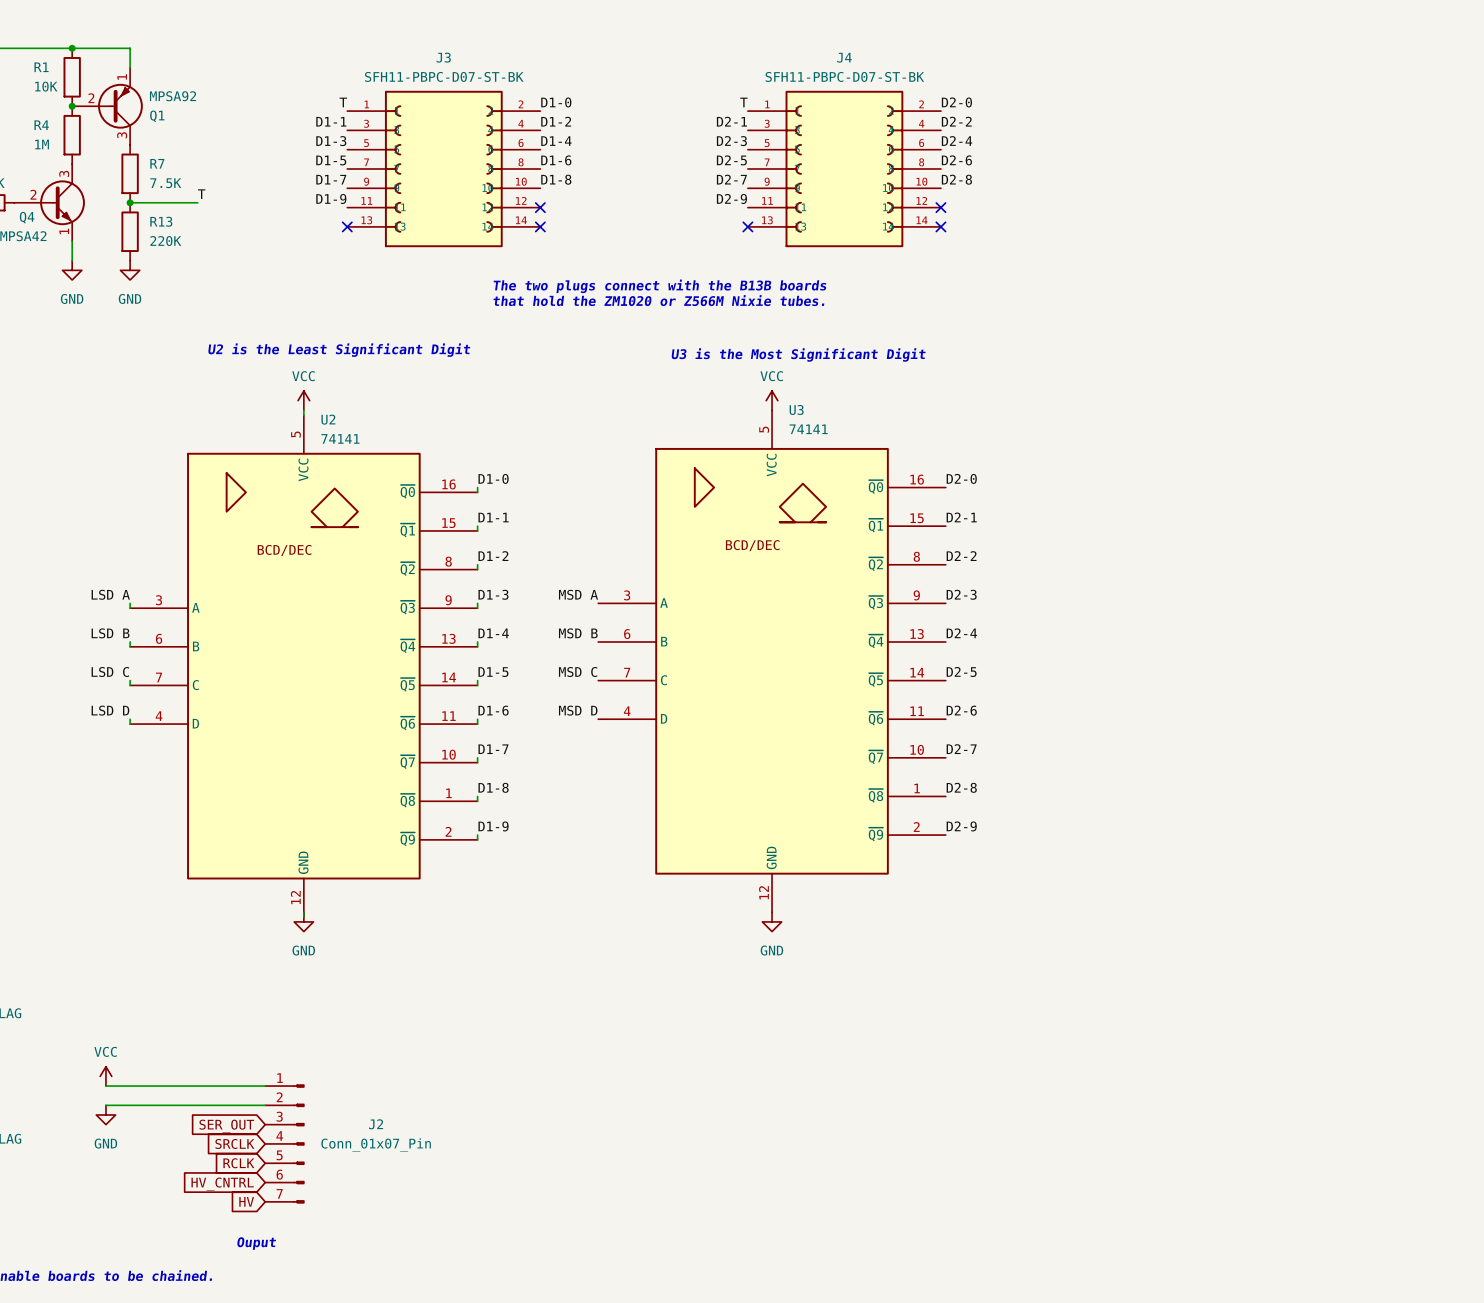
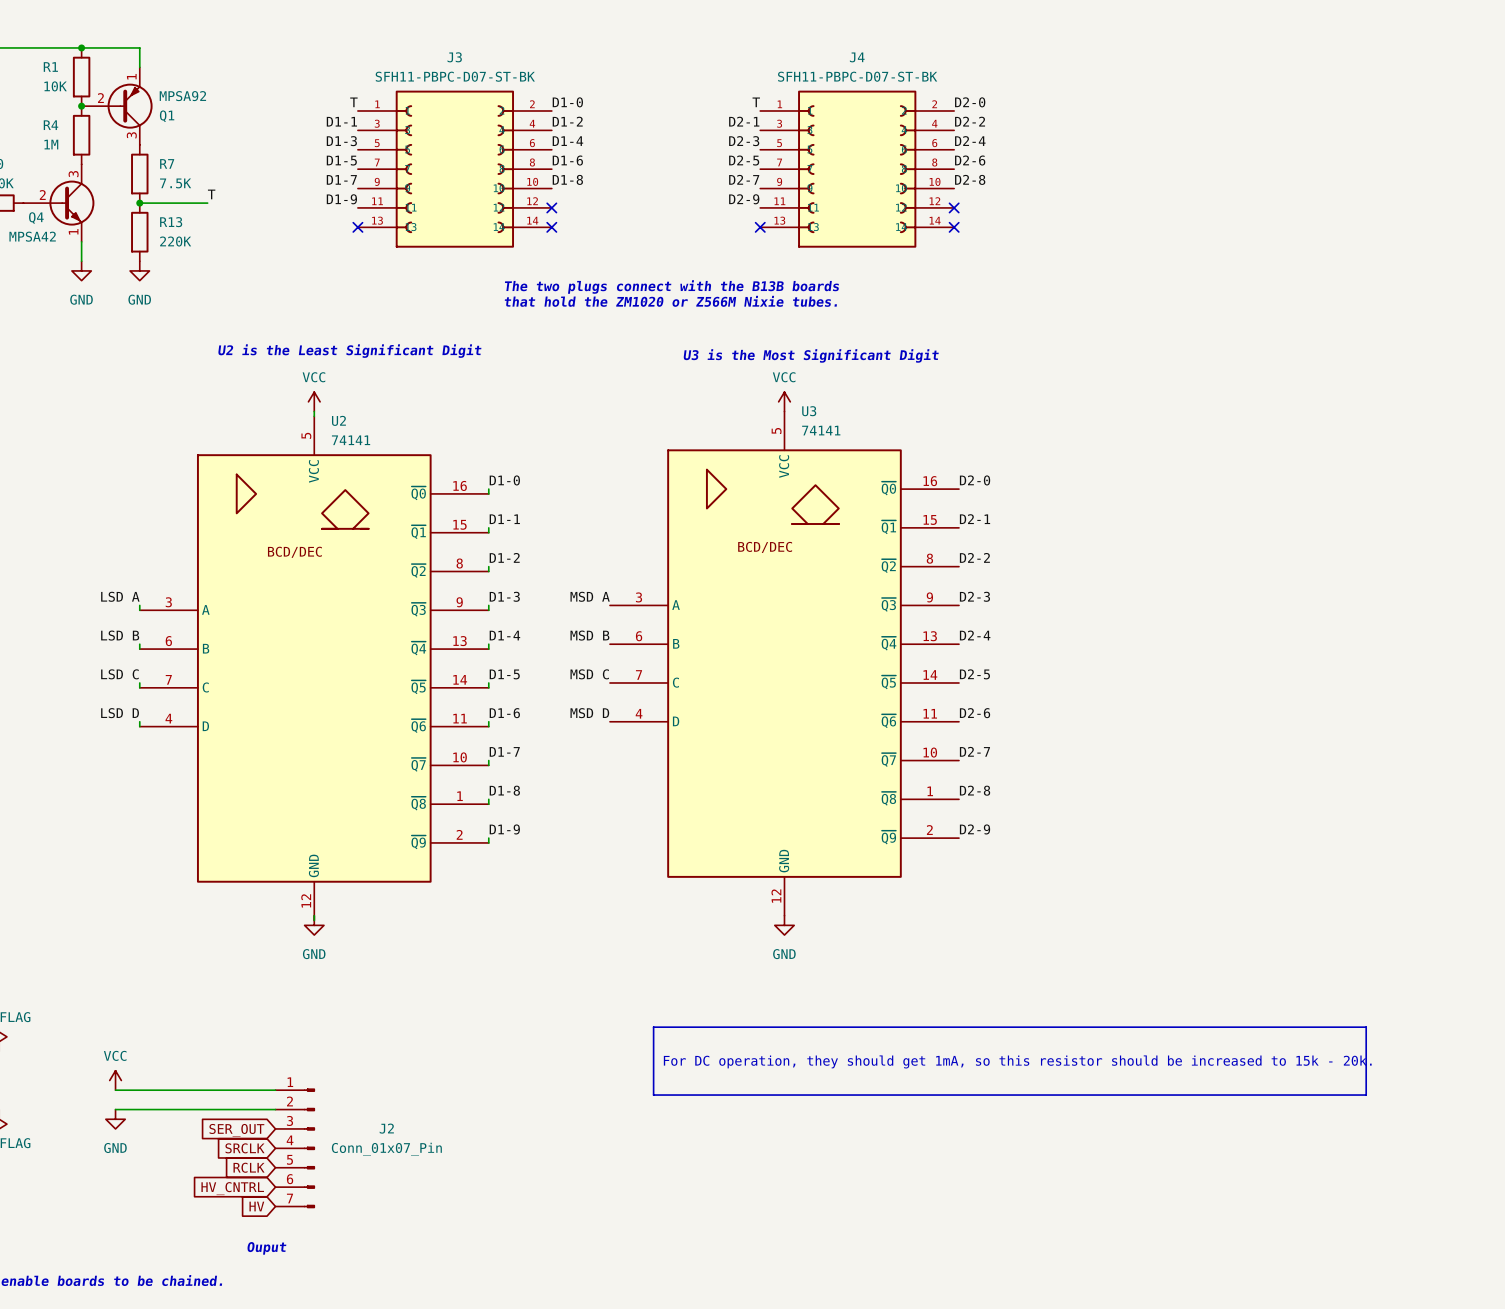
line: none -> (653, 1027) (653, 1095) (1366, 1095) (1366, 1027) (653, 1027)
text: none -> For DC operation, they should get 1mA, so this resistor should be increased to 15k - 20k. (1017, 1061)

